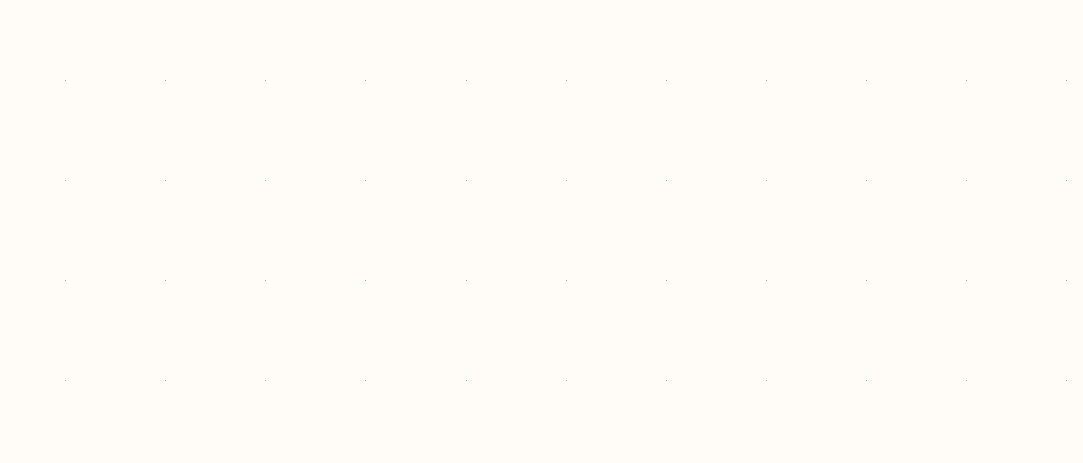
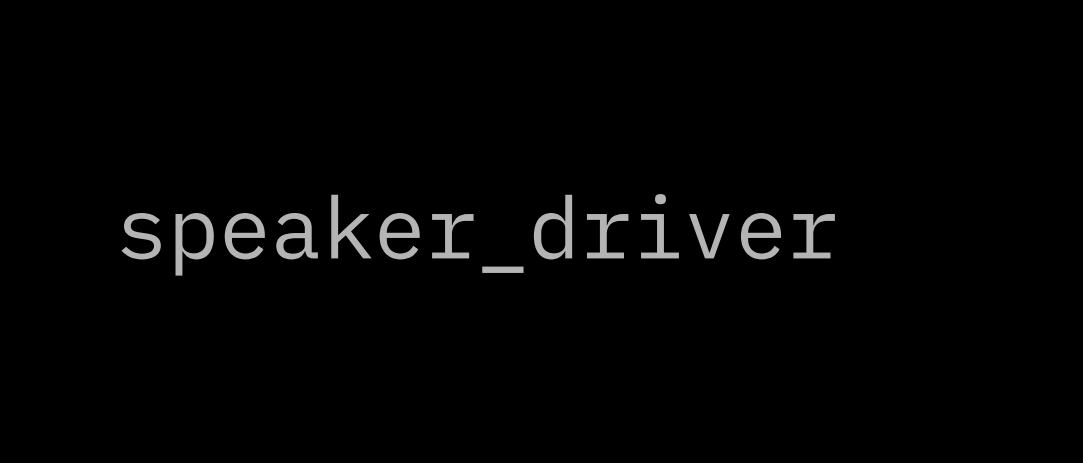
label: none -> speaker_driver (478, 234)

